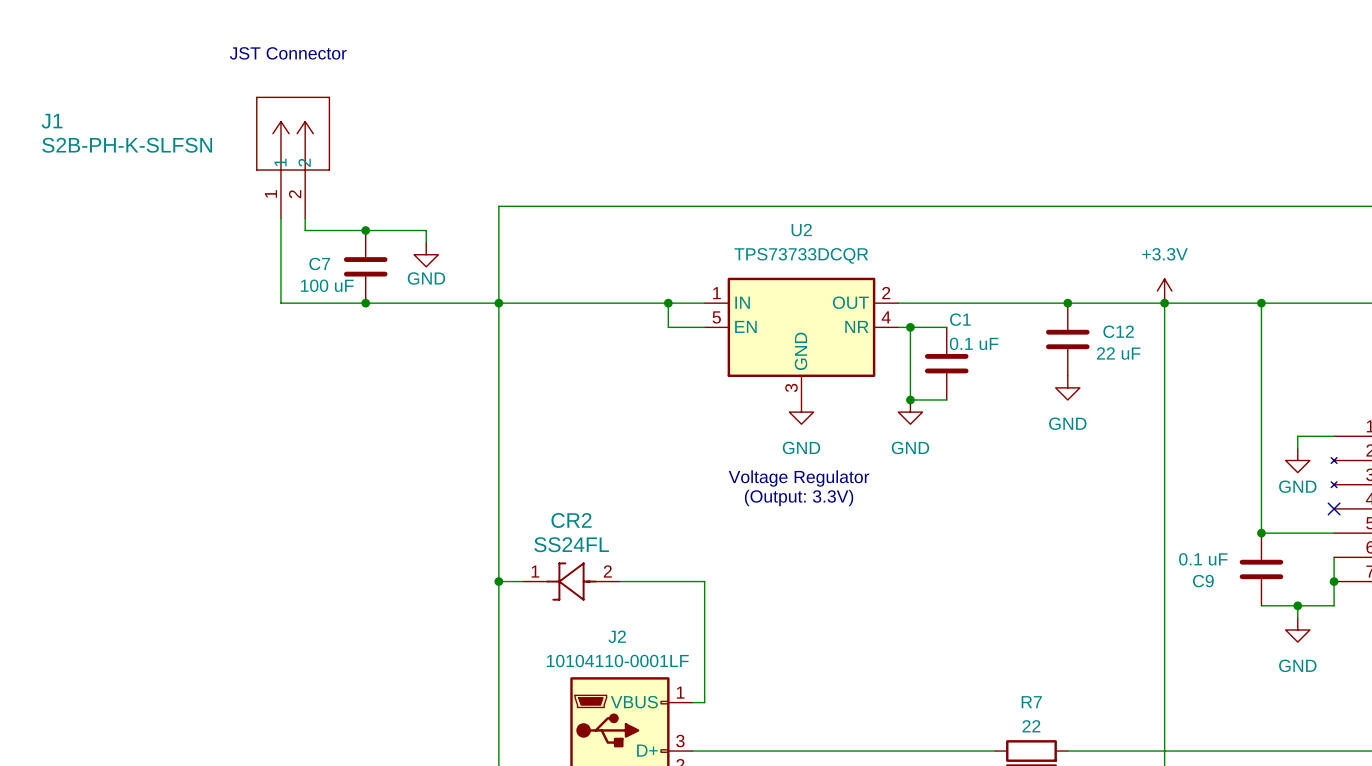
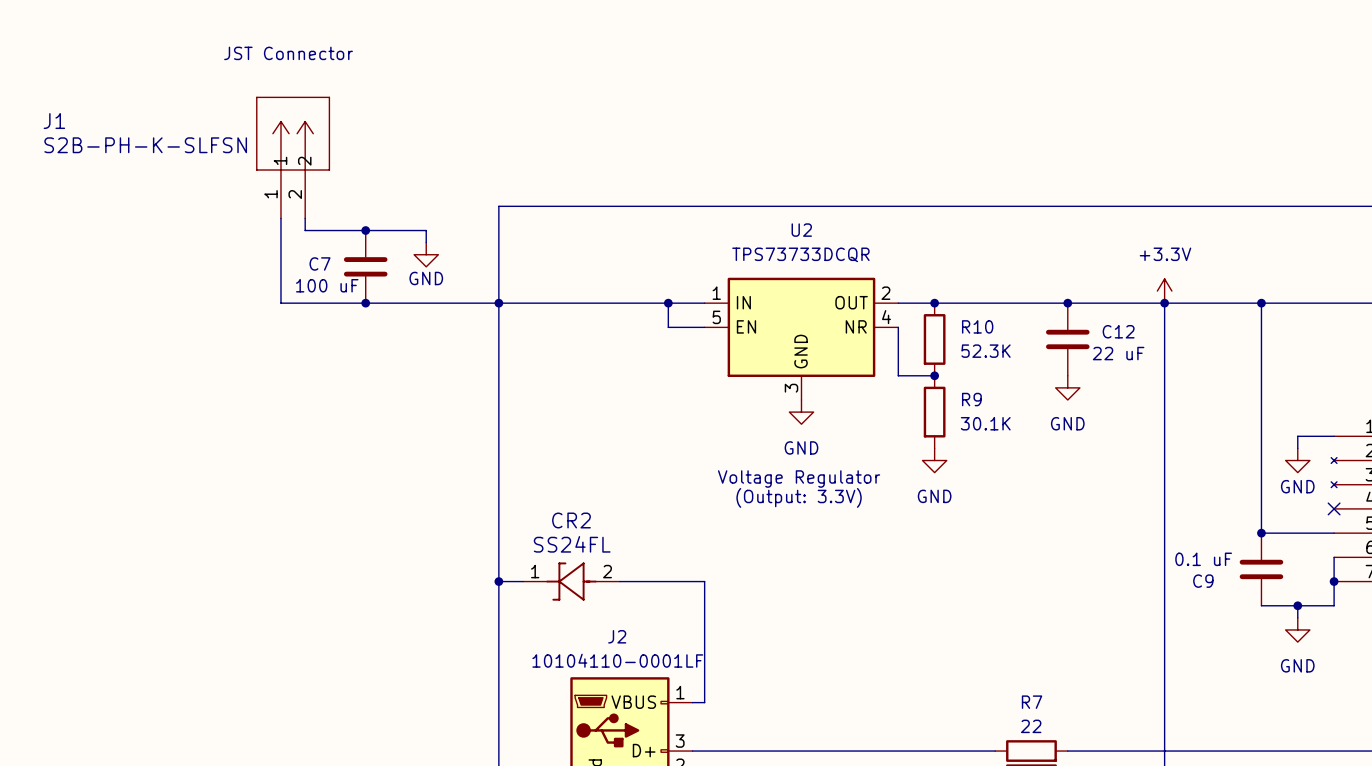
junction: none -> (934, 303)
wire: (898, 327) (946, 327) -> (898, 327) (898, 375) (934, 375)
wire: (910, 327) (910, 399) (946, 399) -> none
junction: (910, 327) -> none
R10: none -> 52.3K (934, 339)
C1: 0.1 uF (946, 363) -> none
junction: none -> (934, 375)
junction: (910, 399) -> none
power symbol position: GND (910, 412) -> GND (934, 460)
R9: none -> 30.1K (934, 412)

